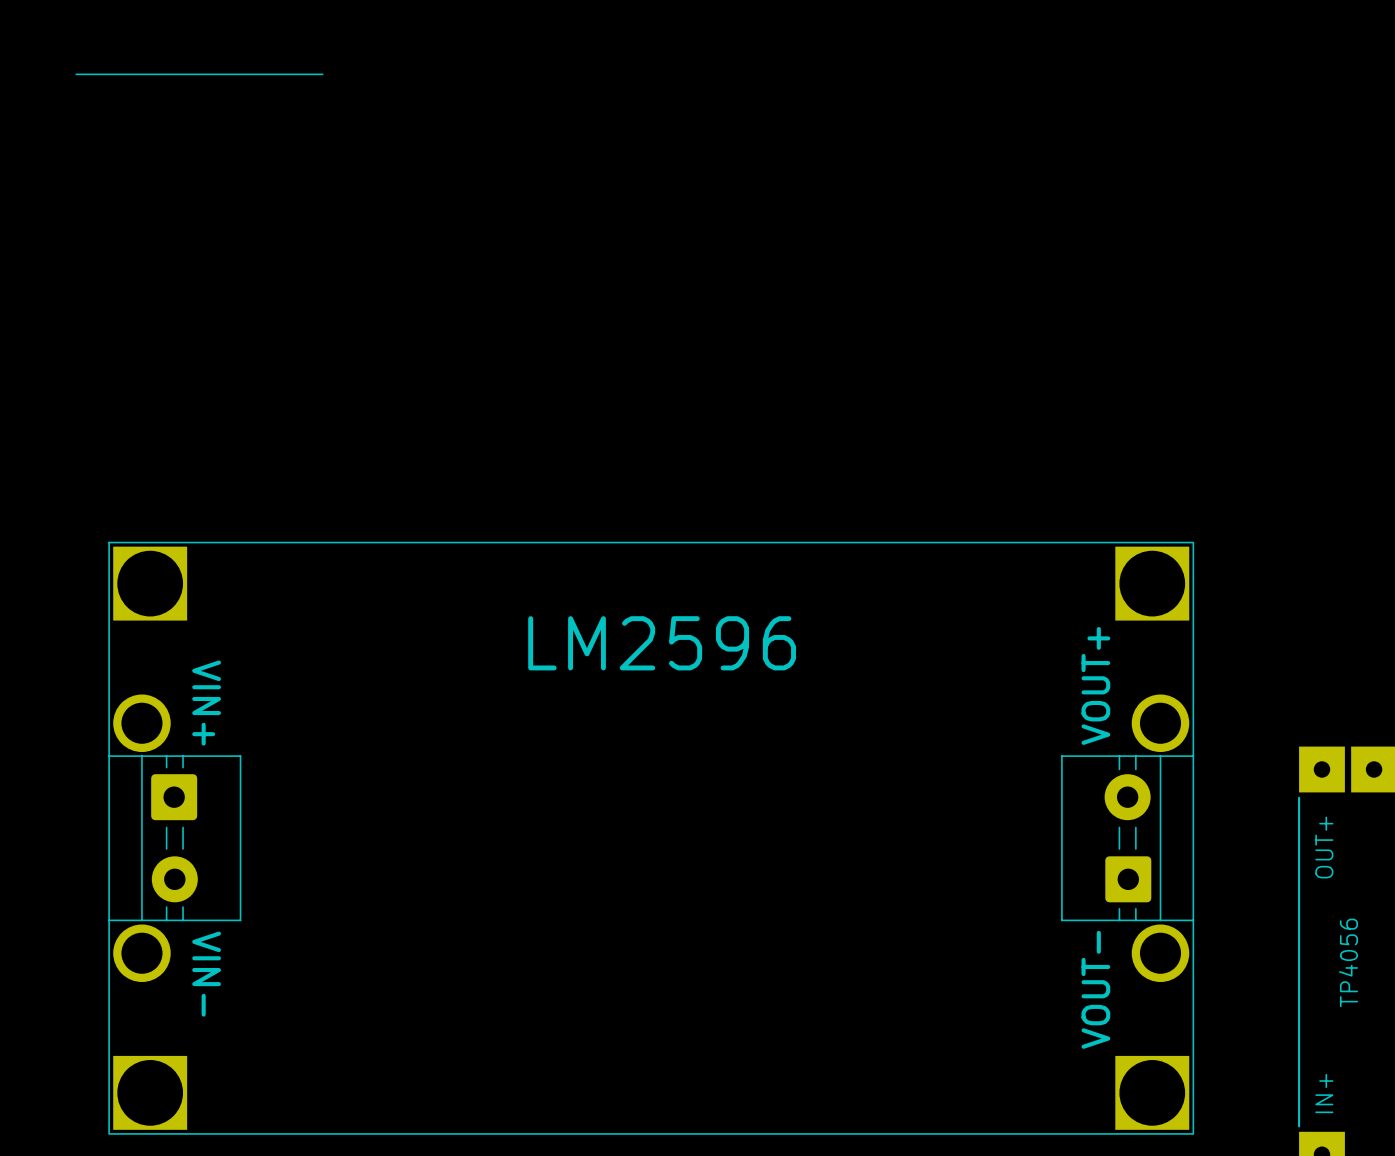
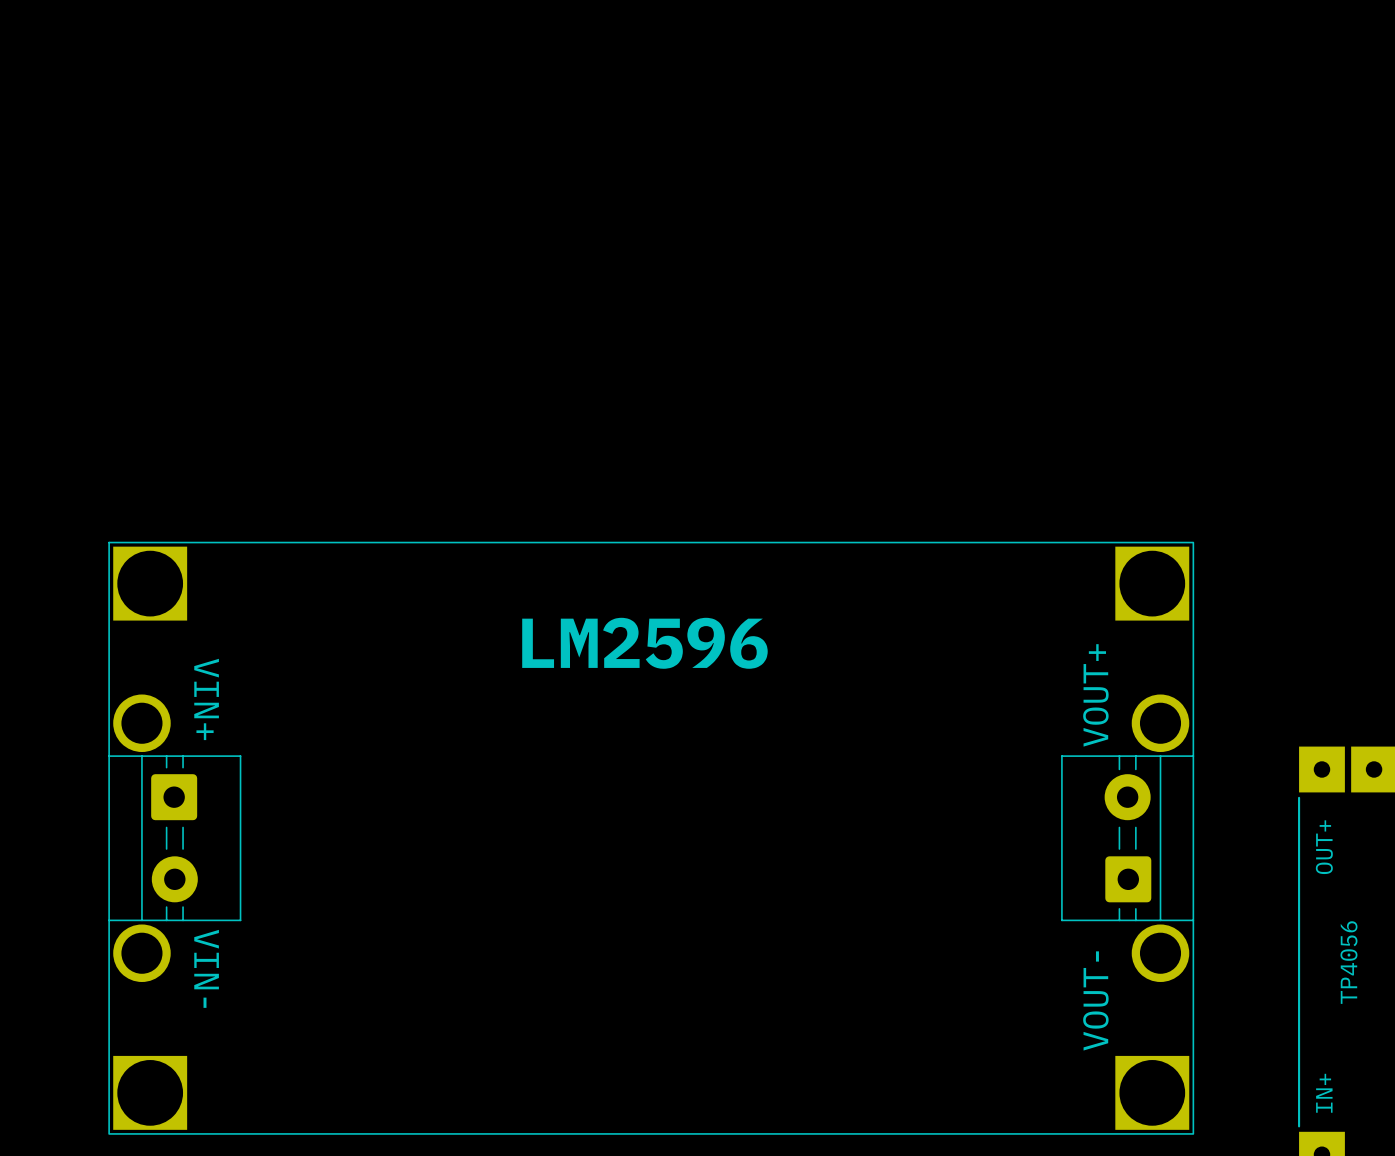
line: (76, 74) (322, 74) -> none

